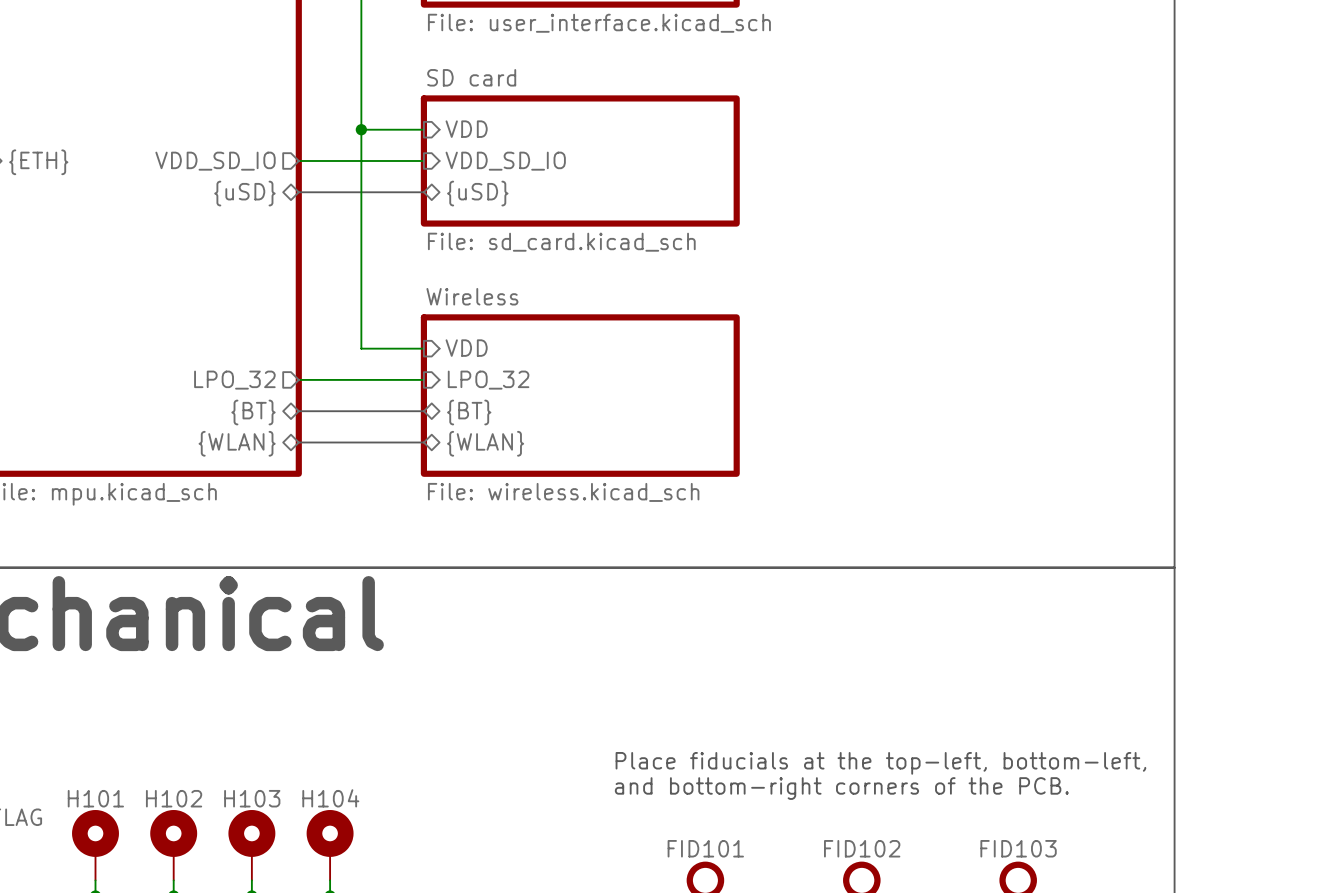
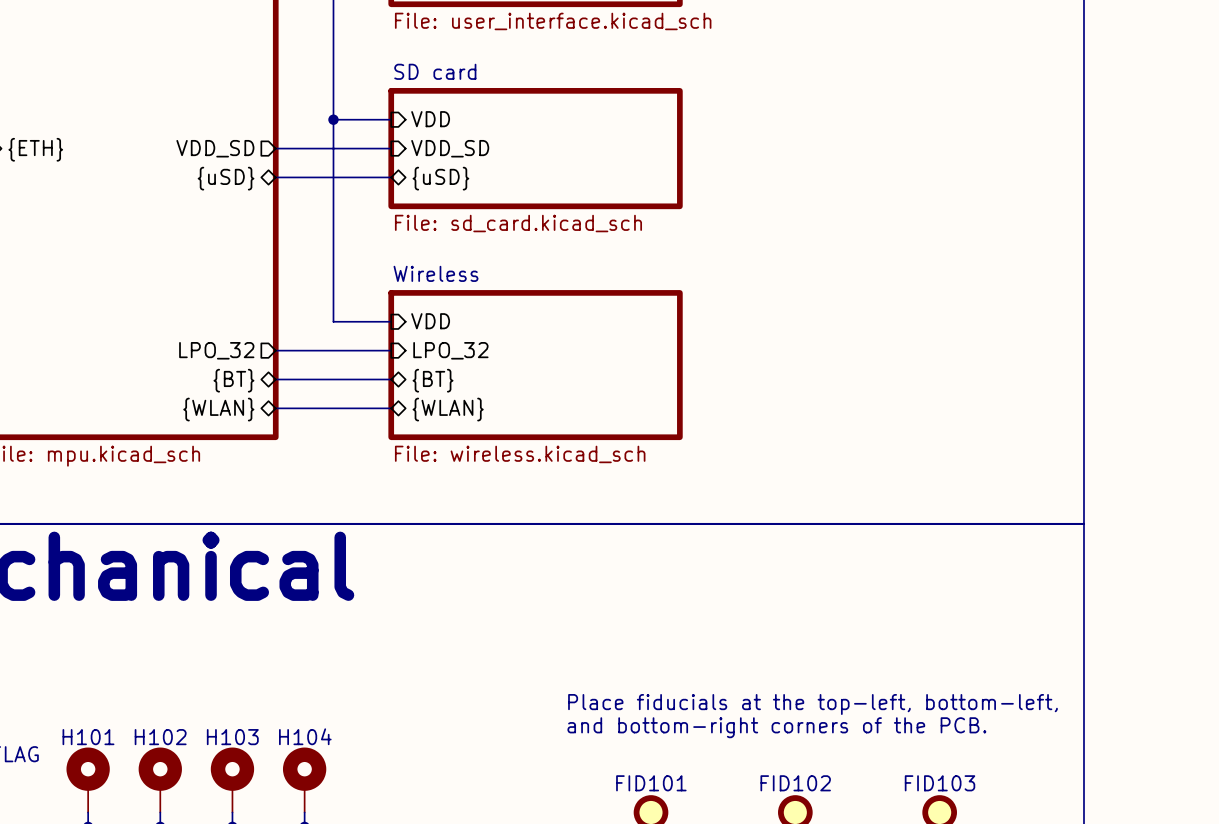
sheet pin: VDD_SD_IO (215, 161) -> VDD_SD (215, 148)
sheet pin: VDD_SD_IO (505, 161) -> VDD_SD (450, 148)

